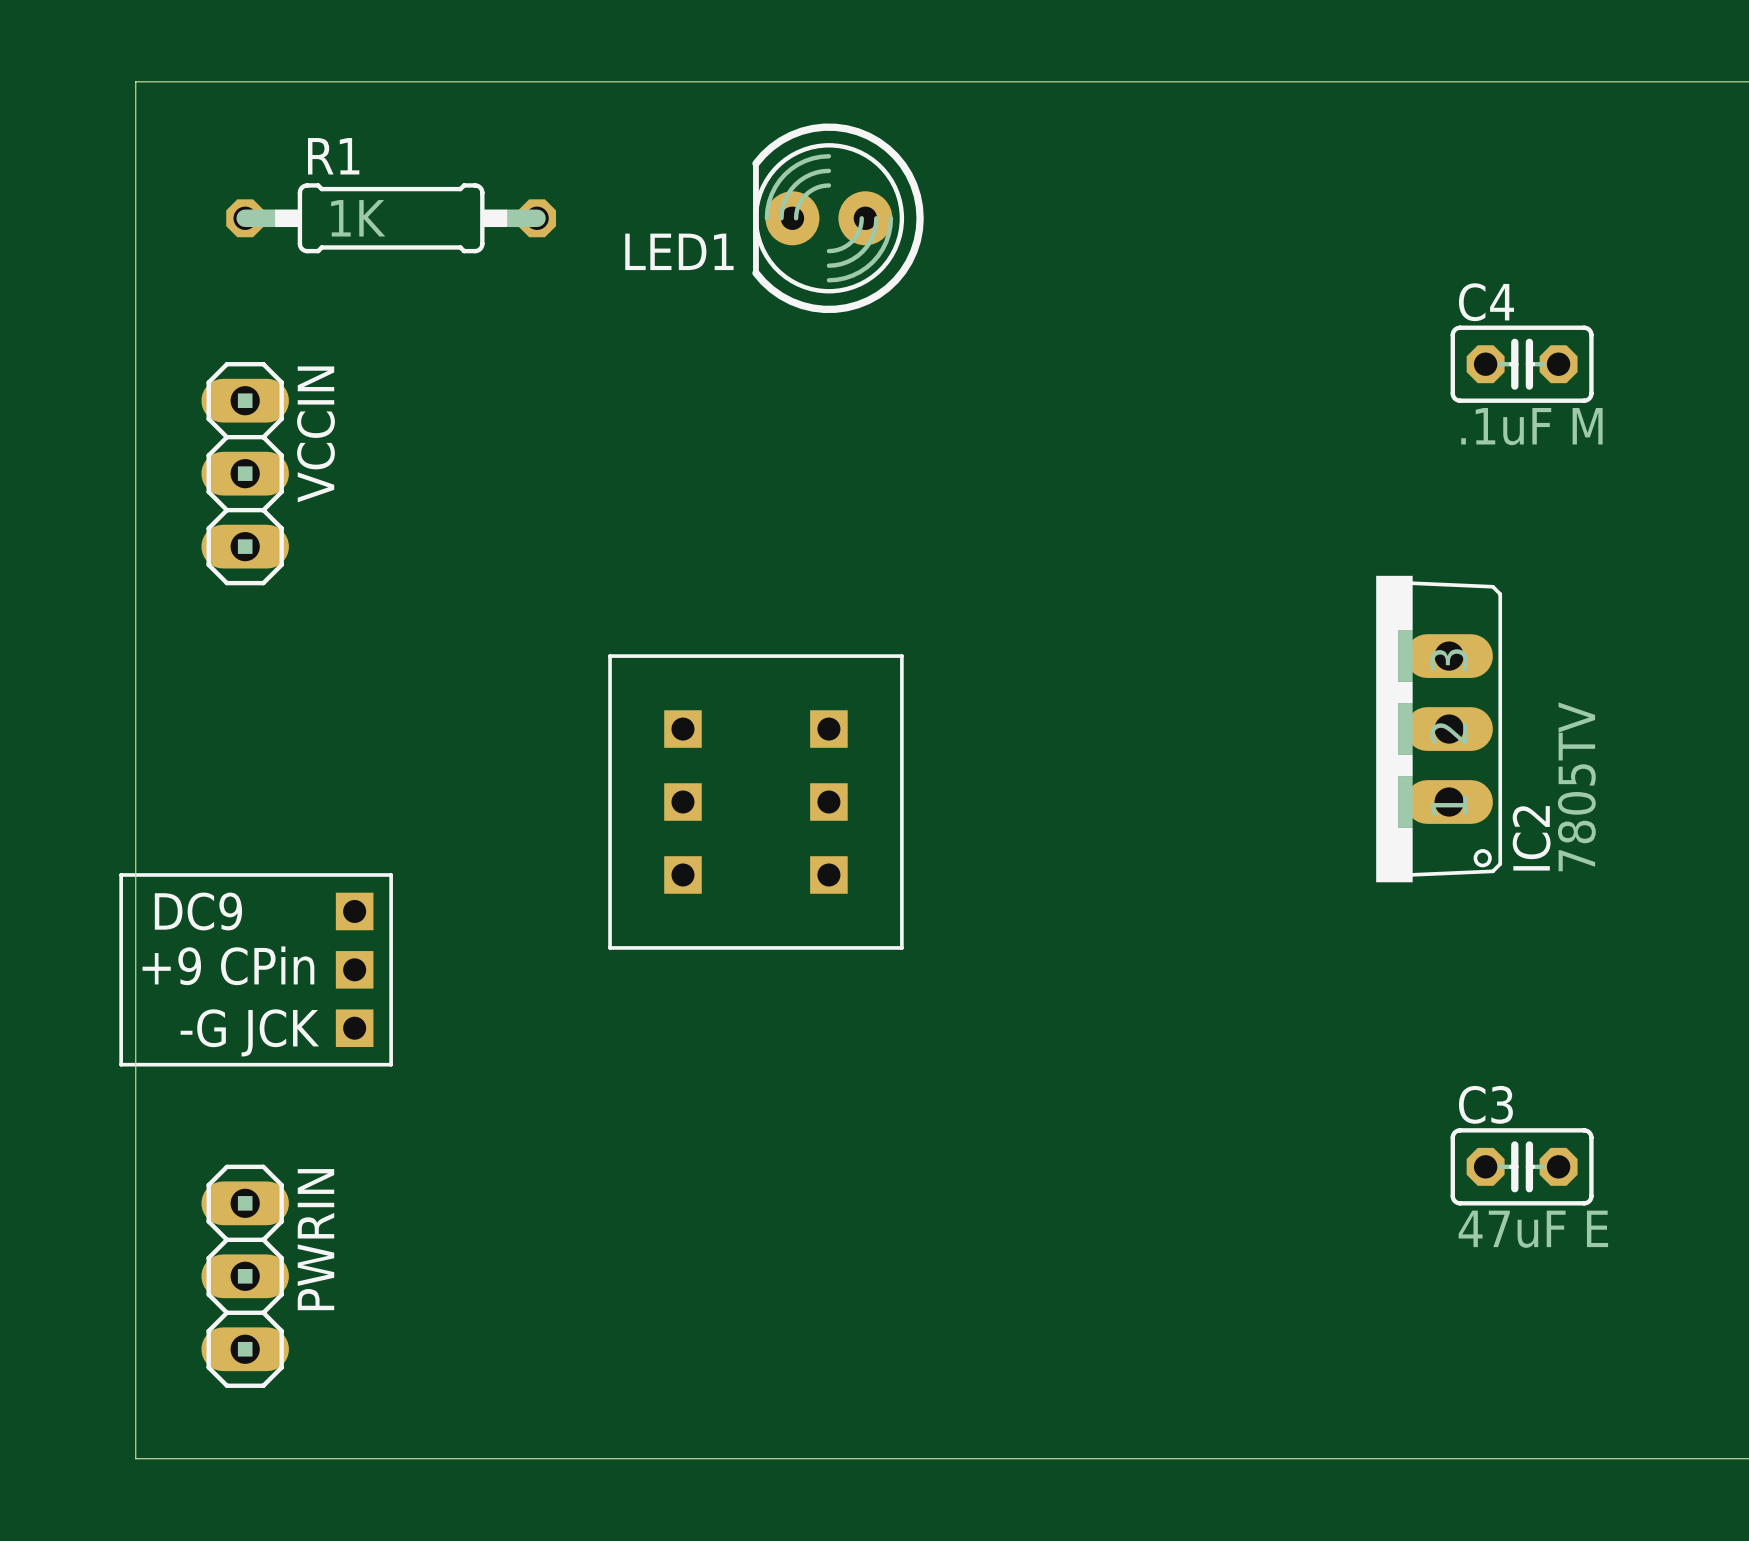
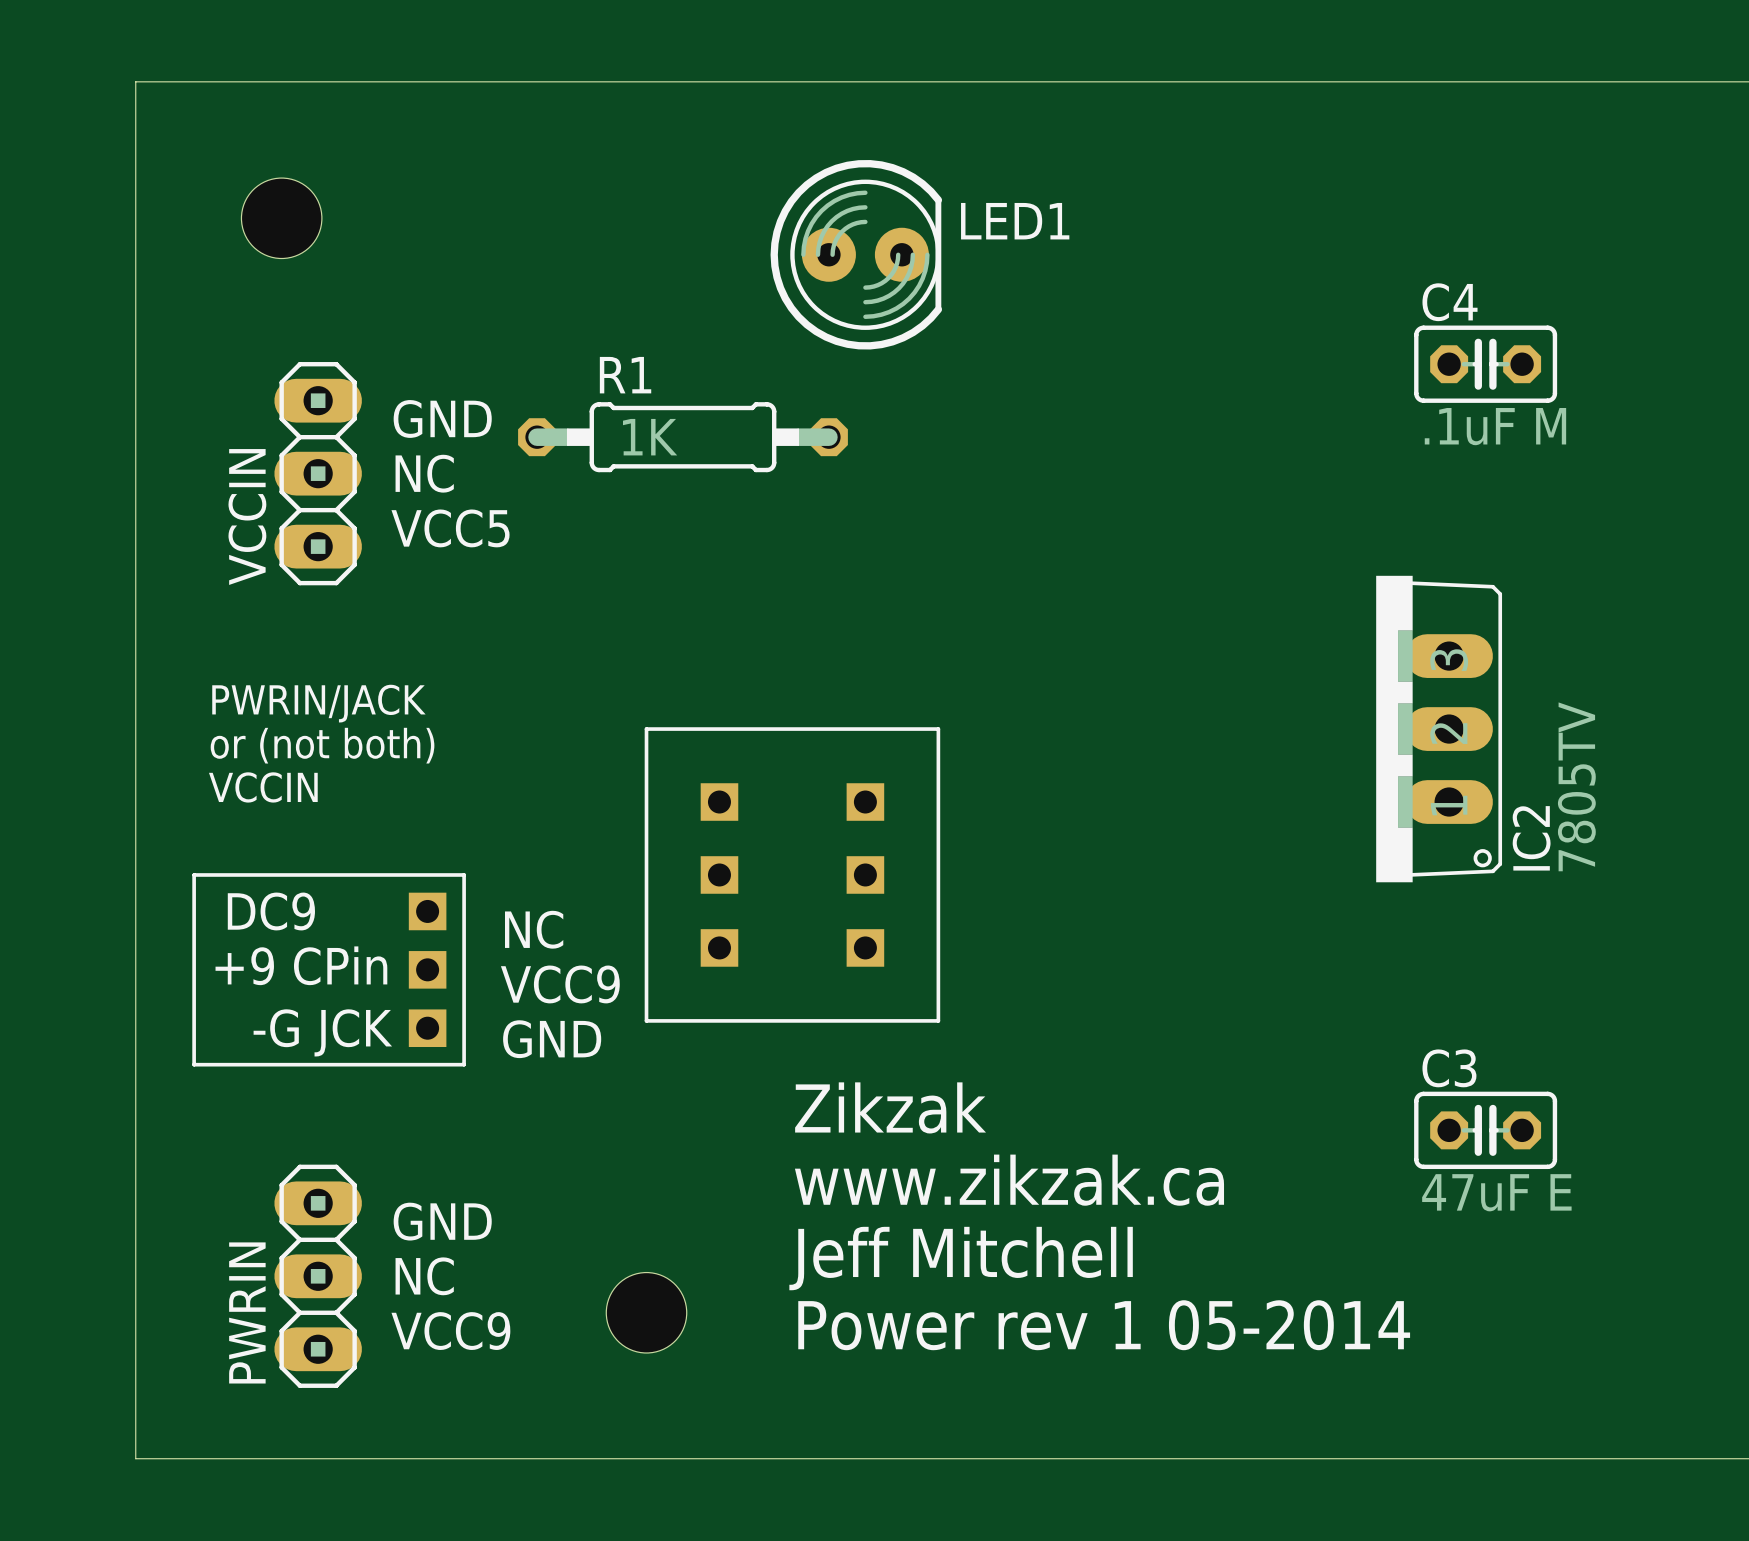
hole: none -> (281, 218)
R1 position: (391, 218) -> (682, 437)
LED1 rotation: 0° (838, 218) -> 180° (856, 254)
C4 position: (1522, 364) -> (1485, 364)
text: none -> GND (442, 418)
VCCIN name position: VCCIN (315, 434) -> VCCIN (247, 517)
VCCIN position: (245, 473) -> (318, 473)
text: none -> NC (424, 473)
text: none -> VCC5 (450, 528)
text: none -> PWRIN/JACK (318, 703)
text: none -> or (not both) (322, 745)
text: none -> VCCIN (263, 787)
part position: (755, 802) -> (792, 874)
text: none -> NC (534, 929)
part position: (256, 969) -> (329, 969)
text: none -> VCC9 (560, 984)
text: none -> GND (552, 1039)
text: none -> Zikzak (890, 1107)
C3 position: (1522, 1166) -> (1485, 1130)
text: none -> www.zikzak.ca (1009, 1180)
text: none -> GND (442, 1221)
PWRIN name position: PWRIN (315, 1239) -> PWRIN (247, 1312)
text: none -> Jeff Mitchell (961, 1258)
PWRIN position: (245, 1276) -> (318, 1276)
text: none -> NC (424, 1276)
hole: none -> (646, 1312)
text: none -> Power rev 1 05-2014 (1104, 1325)
text: none -> VCC9 (450, 1331)

